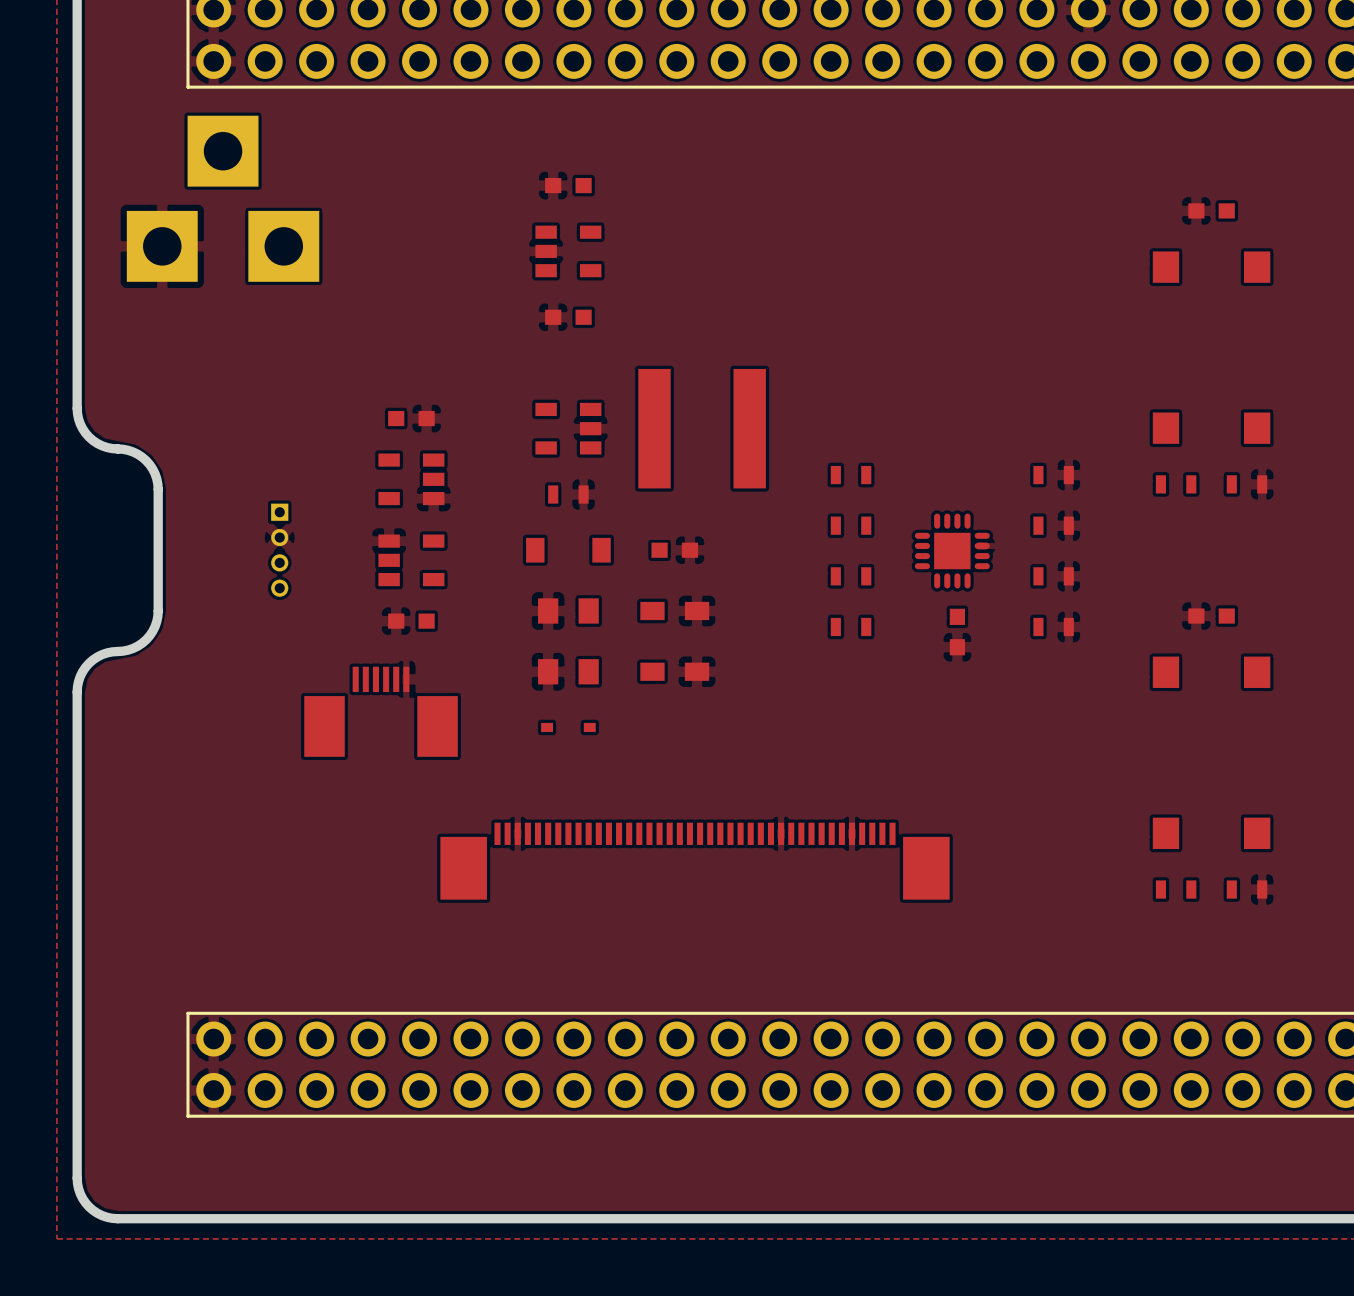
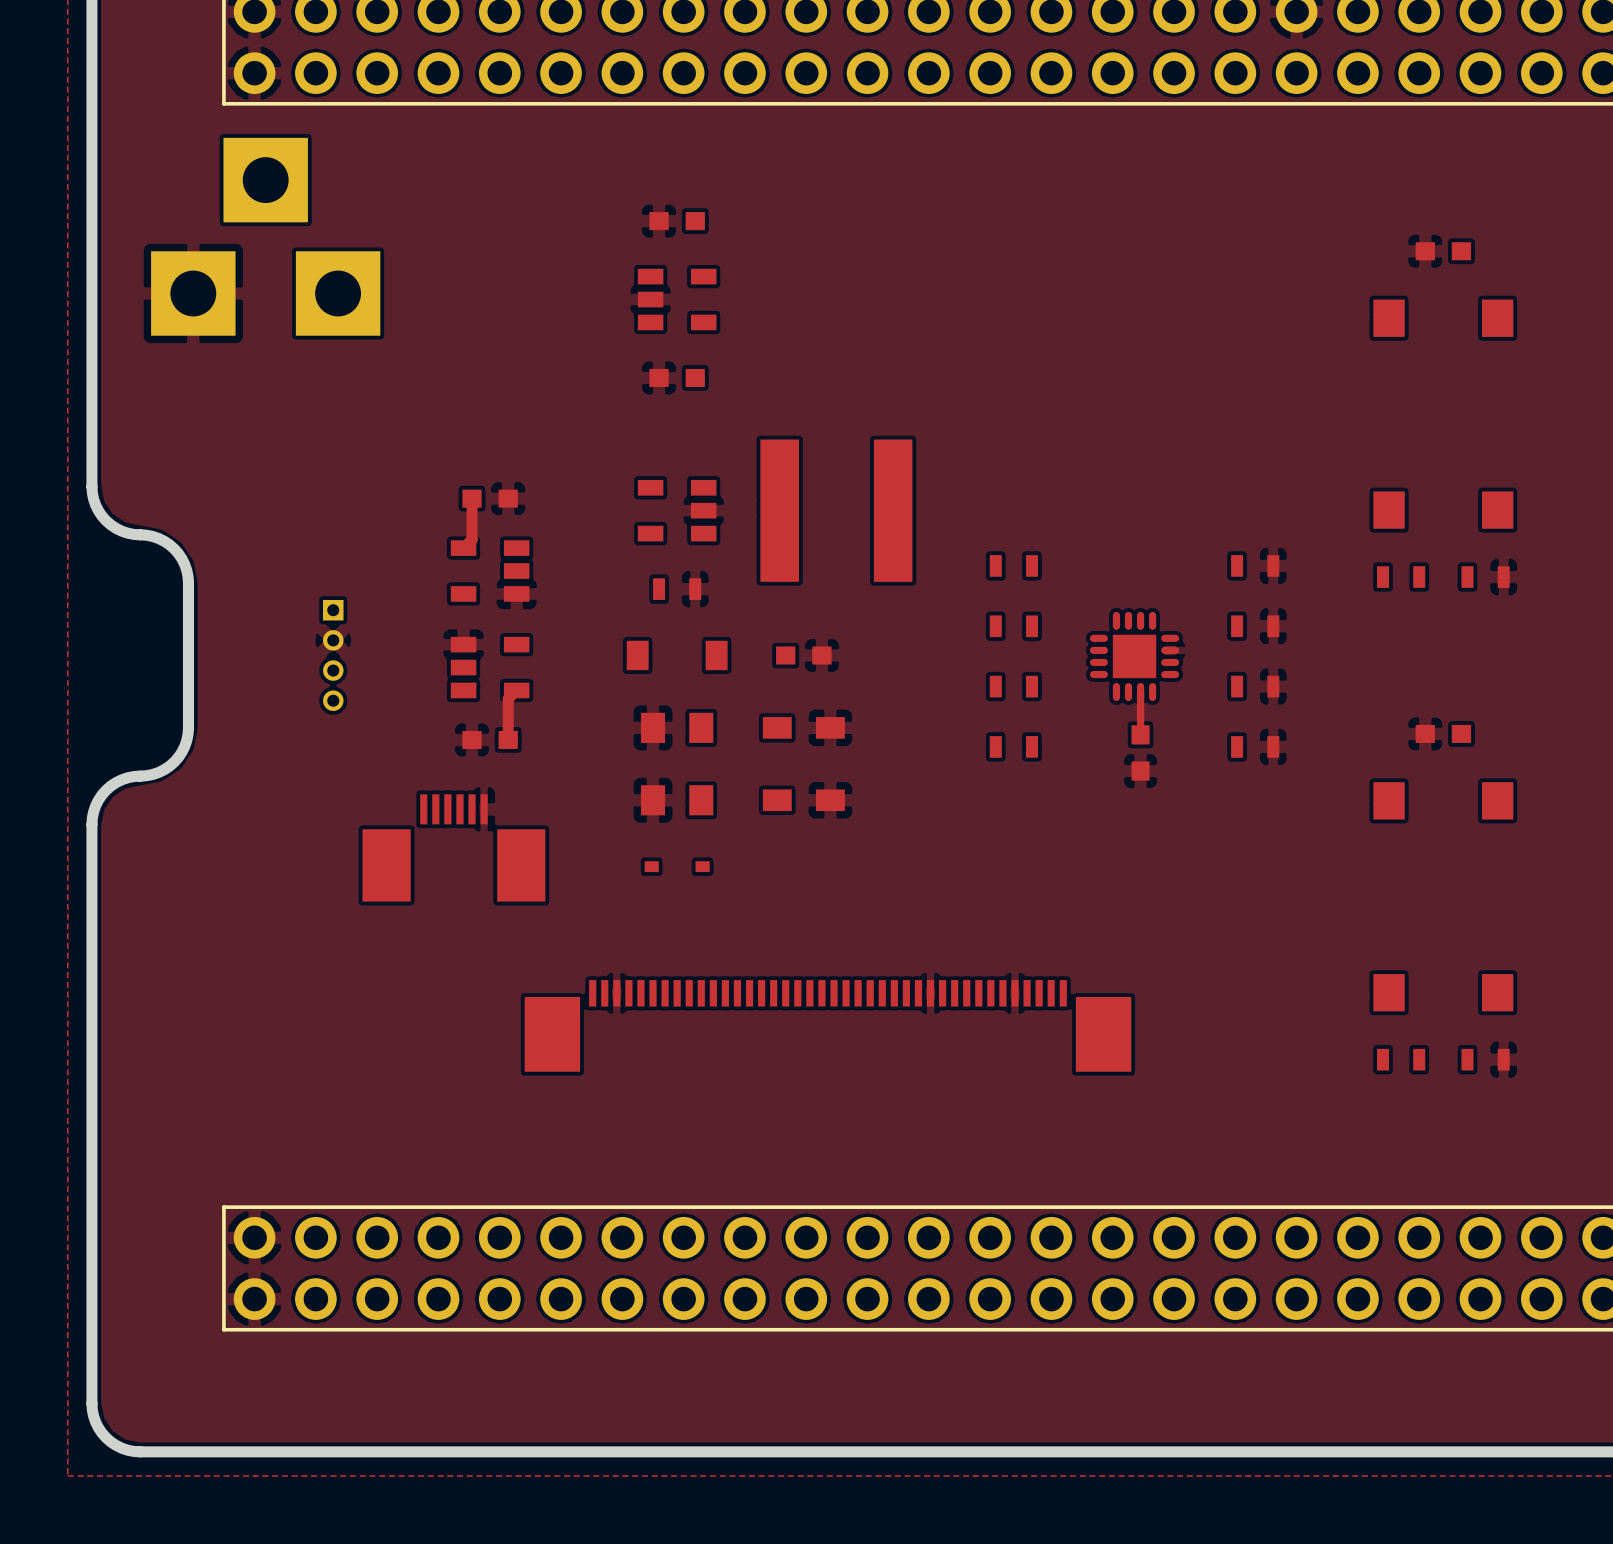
top track: none -> (472, 498) (472, 539) (463, 548)
top track: none -> (516, 690) (508, 698) (508, 739)
top track: none -> (1140, 692) (1140, 734)

